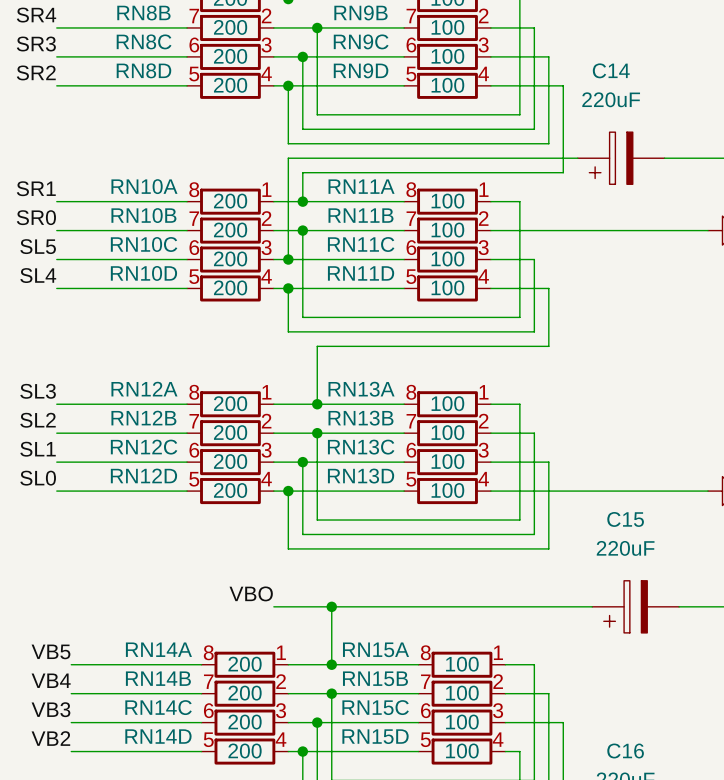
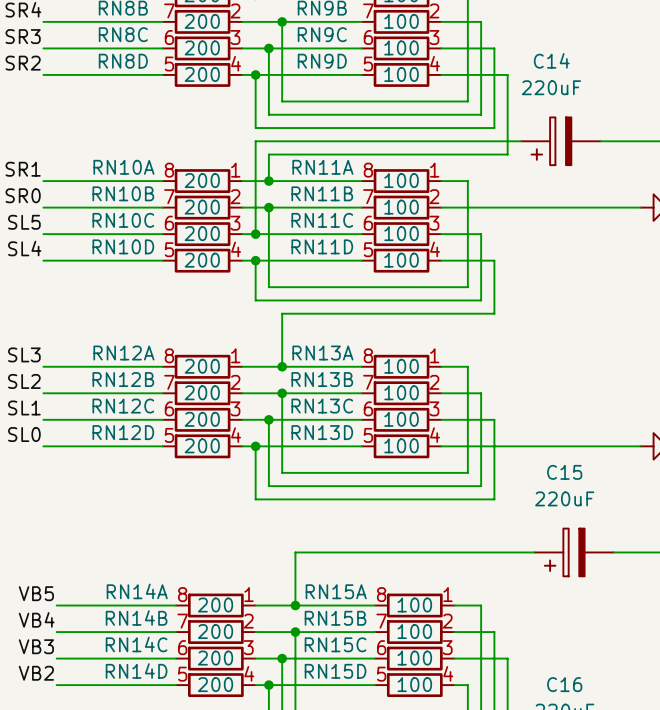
label: VBO (251, 593) -> none
wire: (273, 606) (331, 606) -> none
junction: (331, 606) -> none

